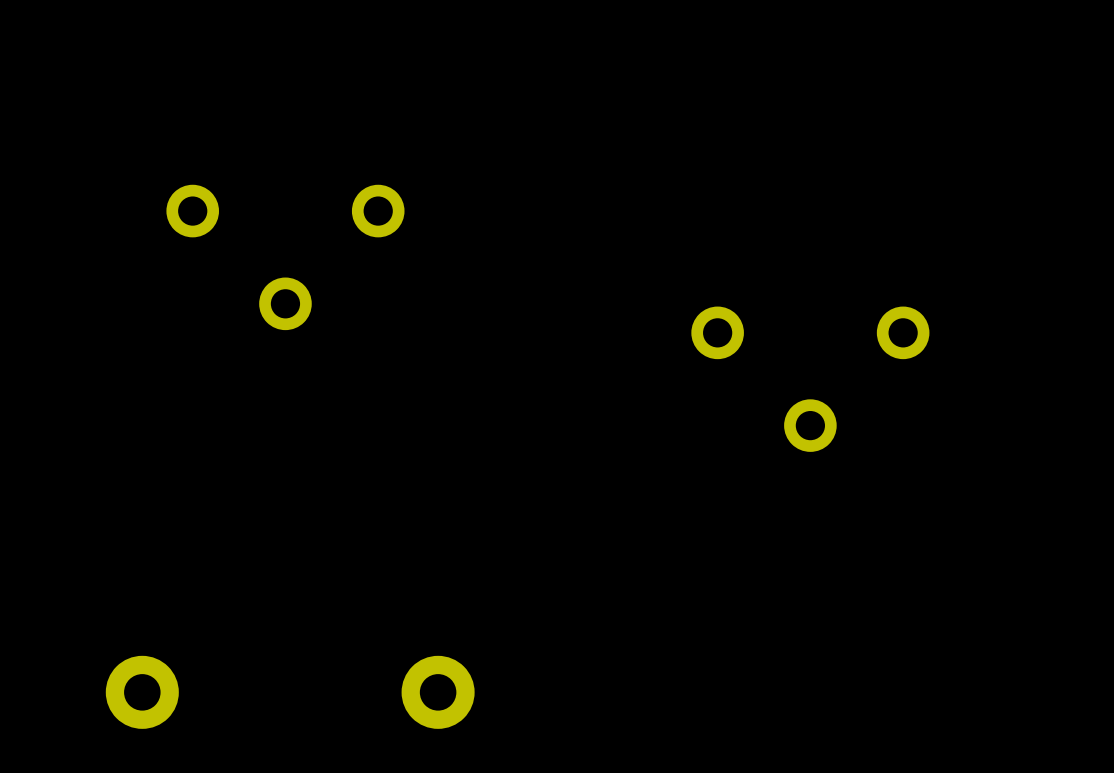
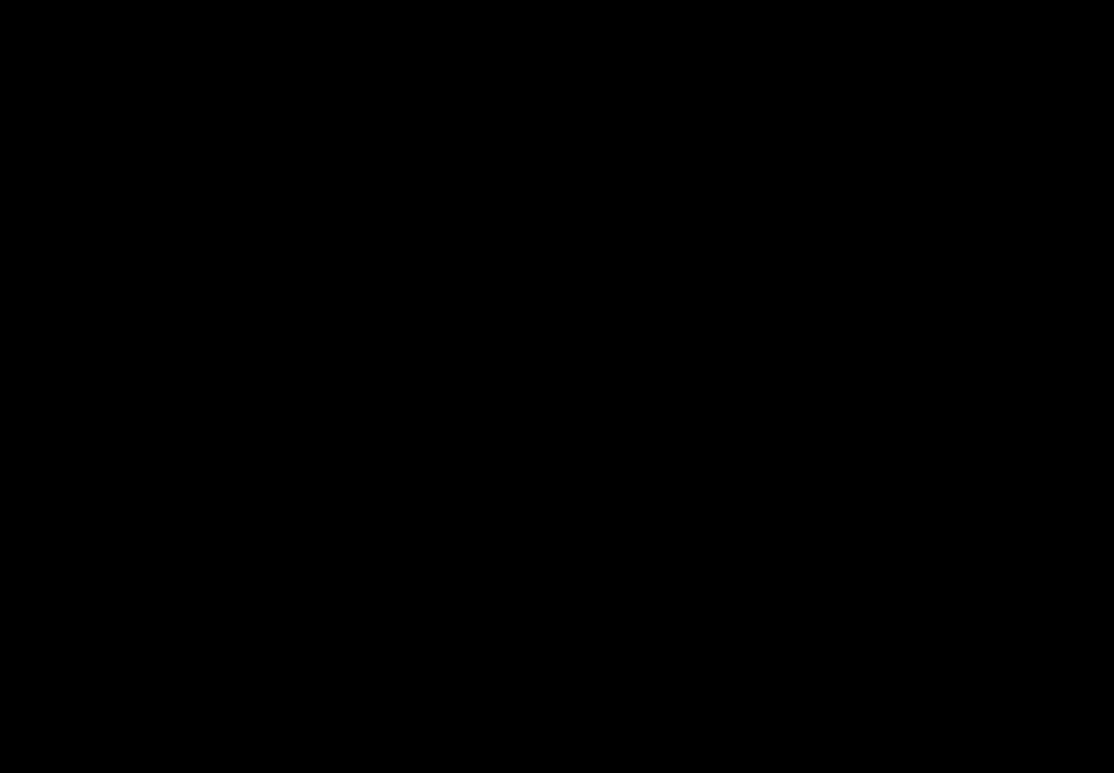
part: (285, 257) -> none
part: (810, 379) -> none
part: (142, 692) -> none
part: (438, 692) -> none

